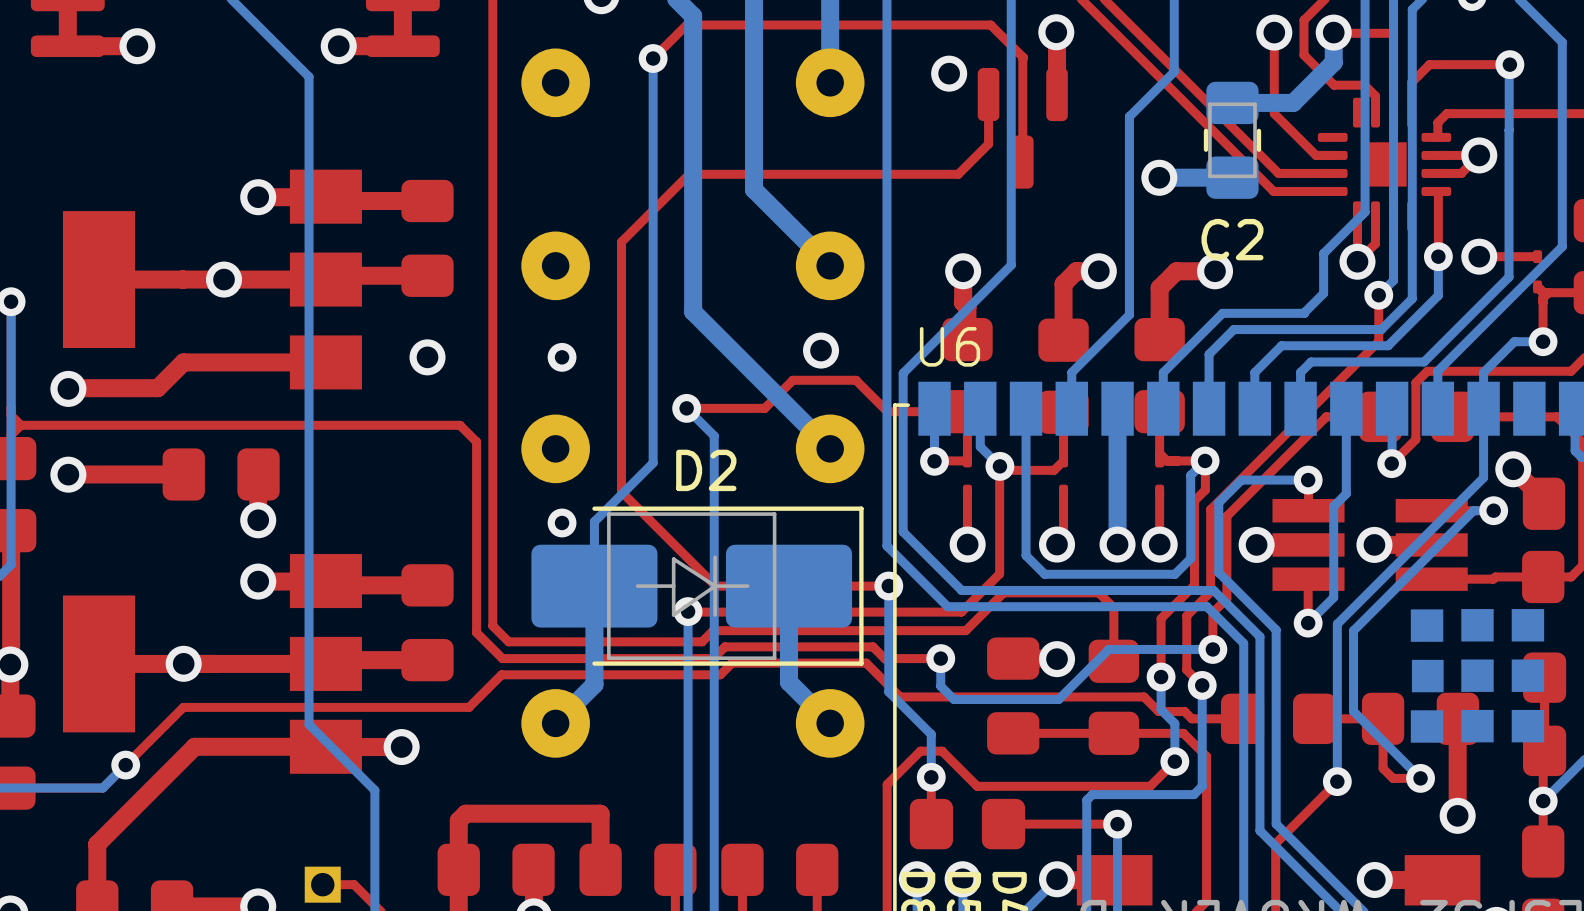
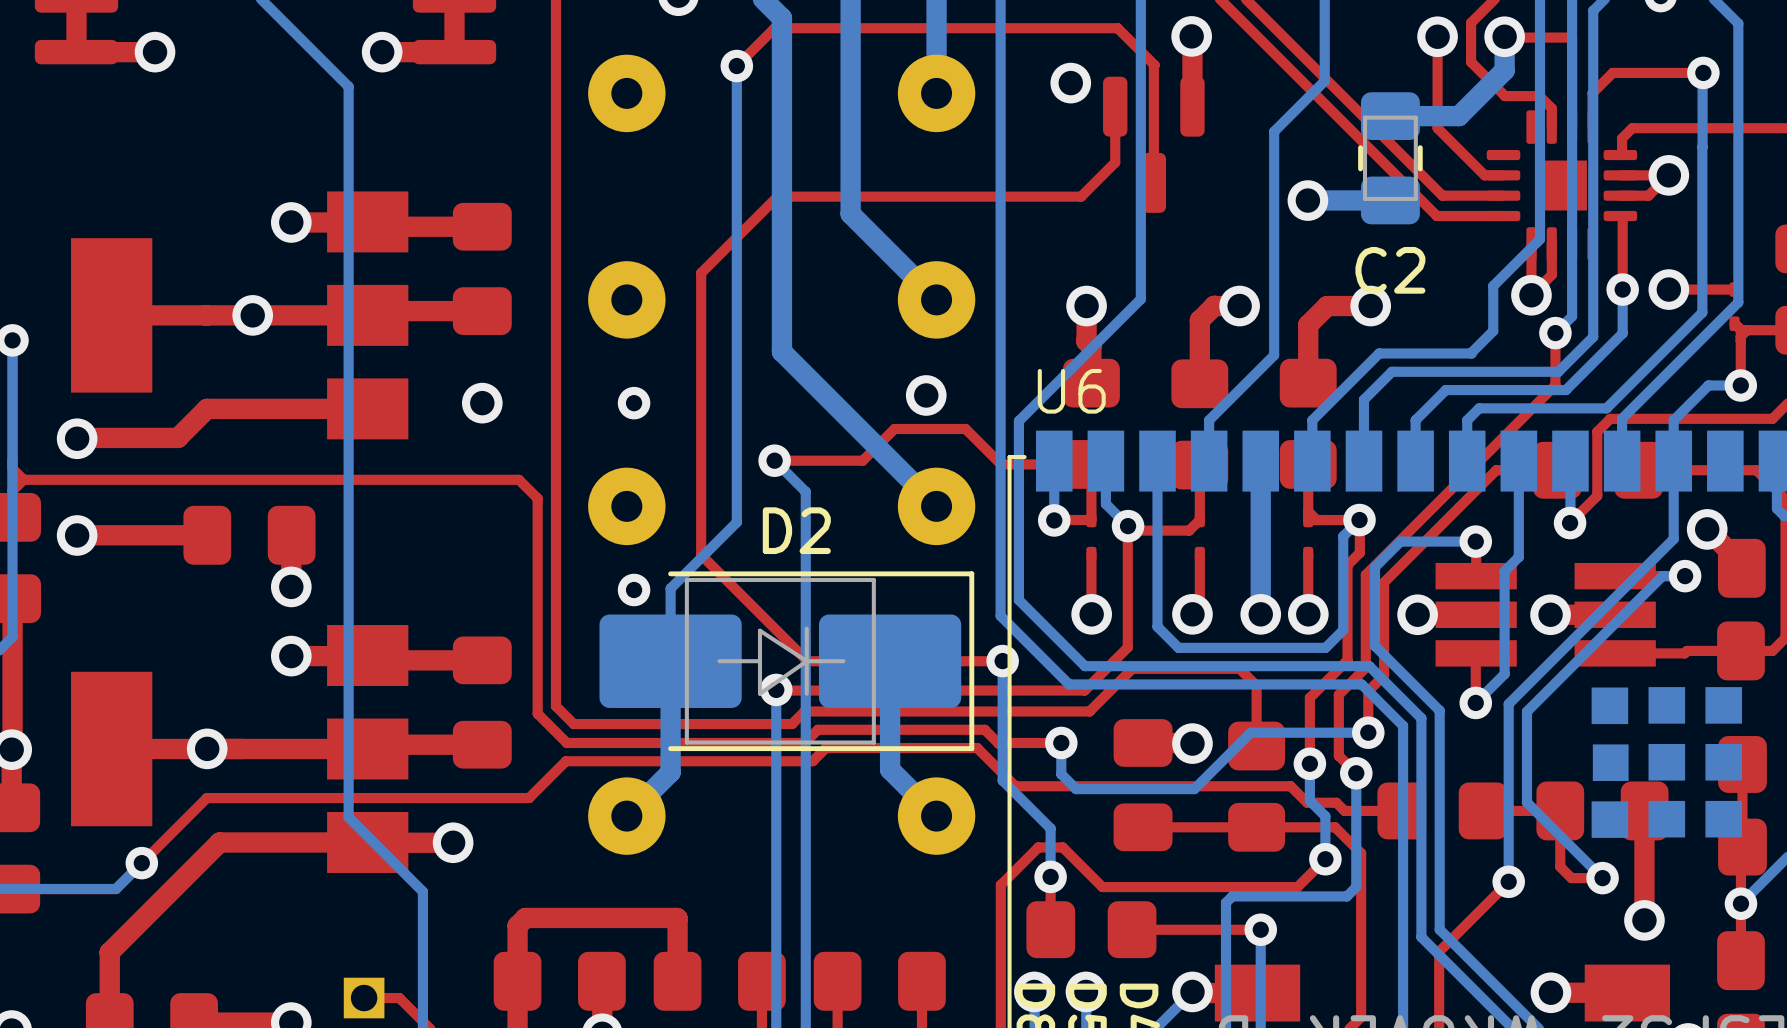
bottom track: (1540, 20) (1562, 42) (1562, 246) (1540, 268) -> (1738, 23) (1738, 302)

